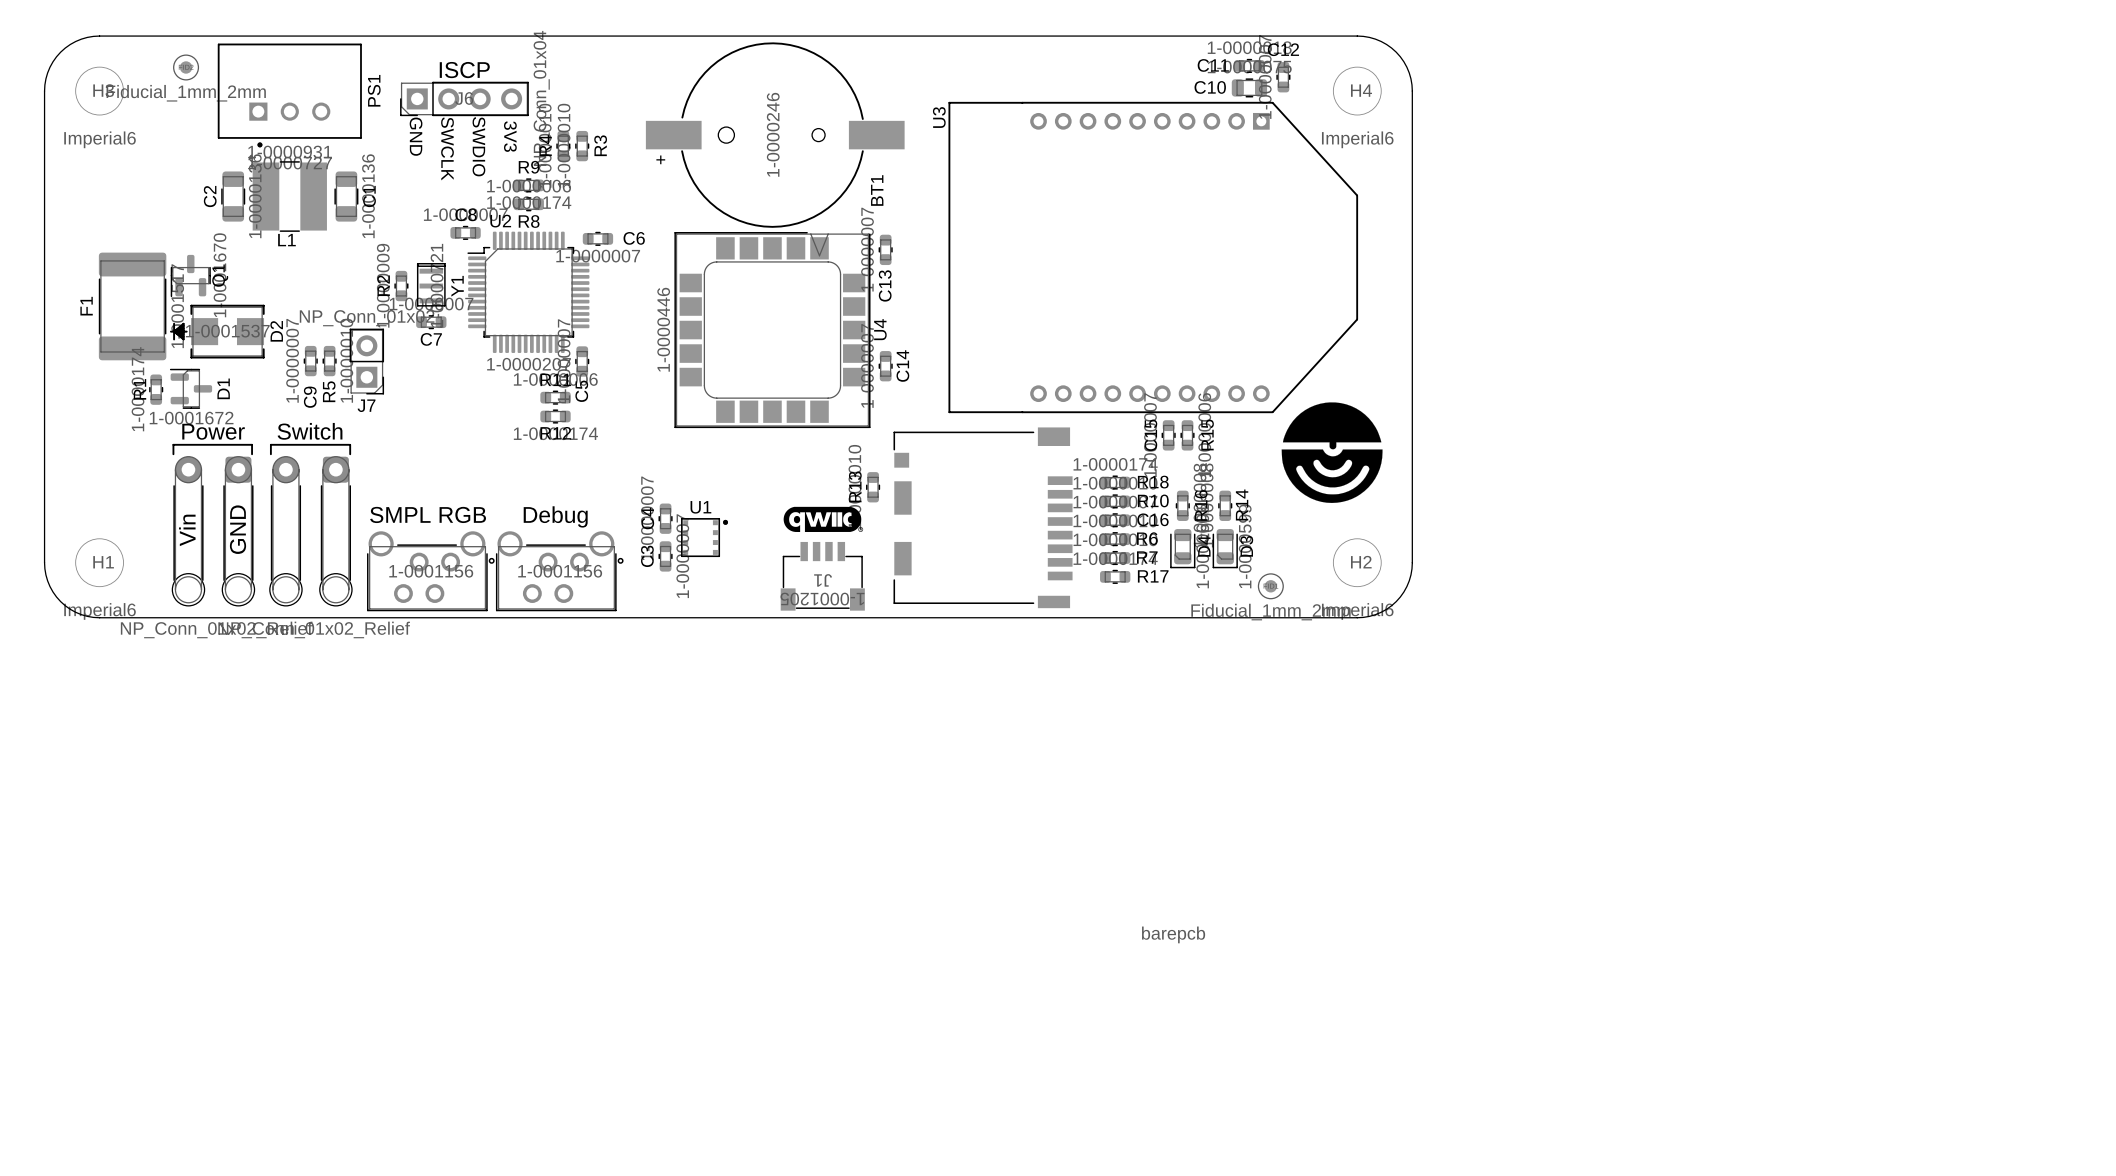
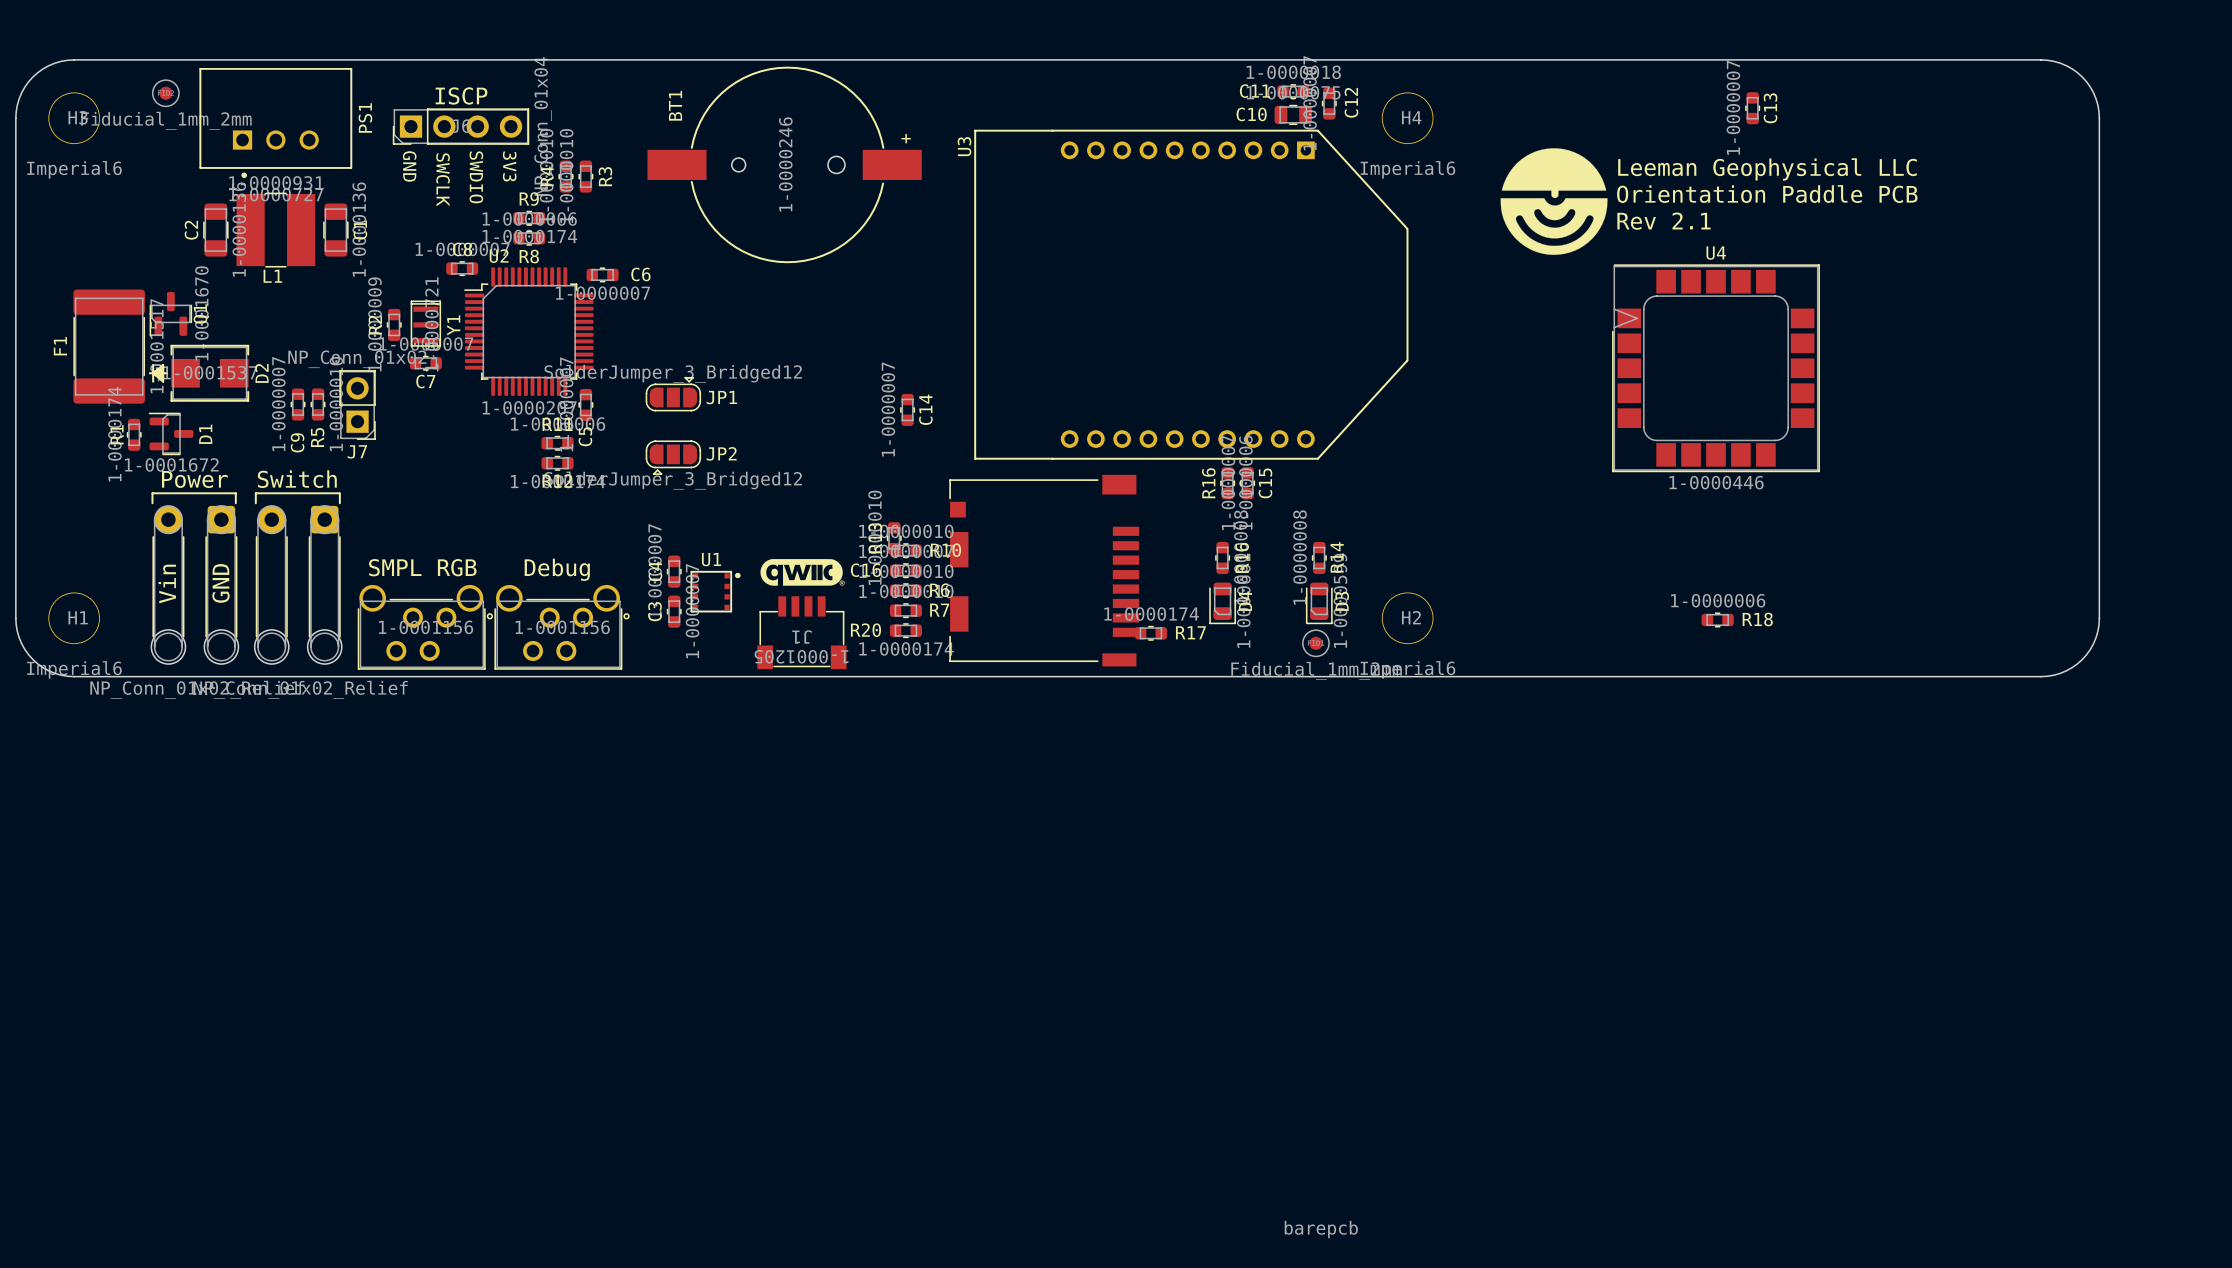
board edge: (1357, 36) (1381, 41) (1396, 52) (1409, 72) (1412, 91) (1411, 568) (1406, 586) (1400, 597) (1386, 609) (1375, 614) (1357, 617) (99, 617) (81, 614) (60, 601) (47, 580) (44, 562) -> (1407, 59) (2041, 59) (2060, 63) (2077, 72) (2093, 92) (2099, 118) (2099, 618) (2096, 637) (2086, 654) (2066, 670) (2041, 676) (74, 676) (54, 673) (32, 659) (19, 637) (15, 618)
C12 name rotation: 0° (1283, 49) -> 90° counterclockwise (1351, 102)
drawing: none -> [1500, 148, 1608, 255]
BT1 rotation: 0° (775, 135) -> 180° (784, 164)
text: none -> Leeman Geophysical LLC (1767, 169)
text: none -> Orientation Paddle PCB (1767, 194)
text: none -> Rev 2.1 (1663, 221)
C13 position: (885, 249) -> (1752, 108)
C13 name position: C13 (885, 285) -> C13 (1770, 108)
U4 rotation: 0° (772, 330) -> 90° counterclockwise (1716, 368)
U4 position: (772, 330) -> (1716, 368)
JP1: none -> SolderJumper_3_Bridged12 (673, 394)
drawing: [1281, 402, 1383, 503] -> none
JP2: none -> SolderJumper_3_Bridged12 (673, 457)
C15 name position: C15 (1150, 435) -> C15 (1265, 483)
C15 position: (1168, 435) -> (1247, 483)
R15 name: R15 (1207, 435) -> R16 (1208, 483)
R18 value: 1-0000174 (1115, 464) -> 1-0000006 (1718, 600)
R18 position: (1115, 482) -> (1717, 619)
R10 position: (1115, 501) -> (905, 550)
R14 position: (1225, 505) -> (1319, 557)
part position: (983, 517) -> (1044, 570)
drawing position: (823, 519) -> (802, 572)
C16 name position: C16 (1152, 519) -> C16 (865, 570)
C16 position: (1115, 520) -> (905, 570)
R6 position: (1115, 539) -> (905, 590)
D3 position: (1225, 548) -> (1319, 603)
R7 position: (1115, 558) -> (905, 610)
R20: none -> 1-0000174 (905, 630)
J1 position: (822, 576) -> (801, 632)
drawing position: (1173, 934) -> (1321, 1229)

